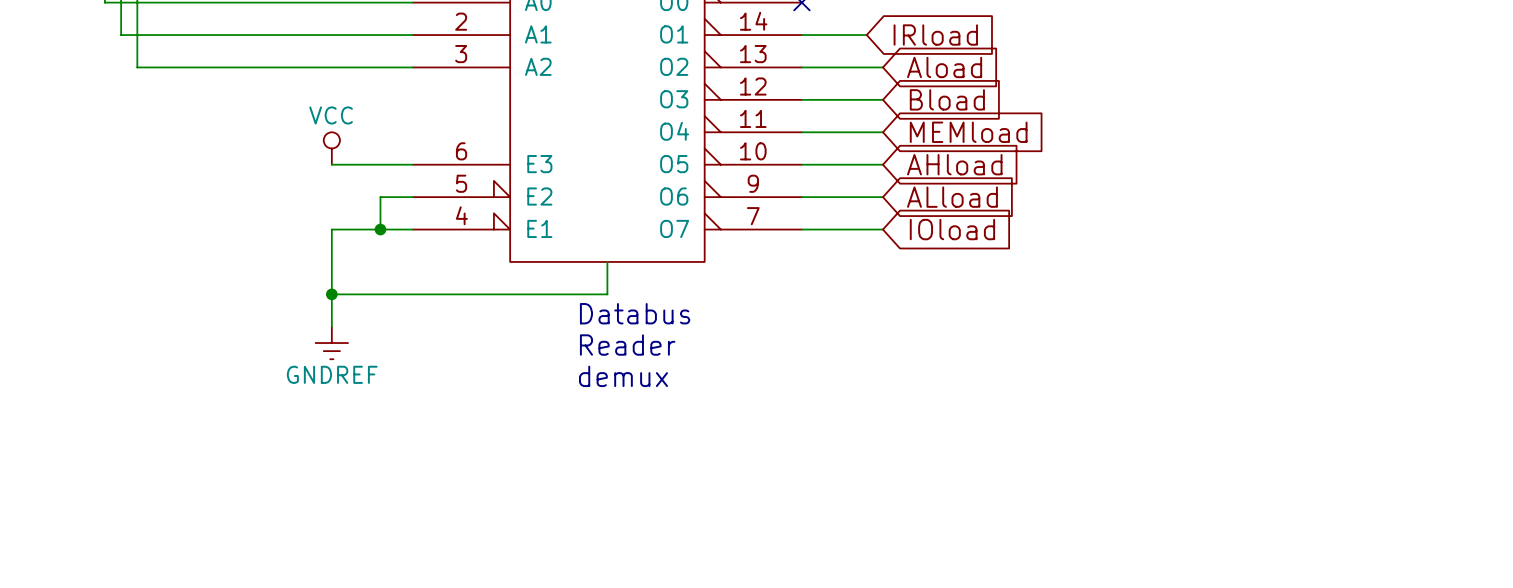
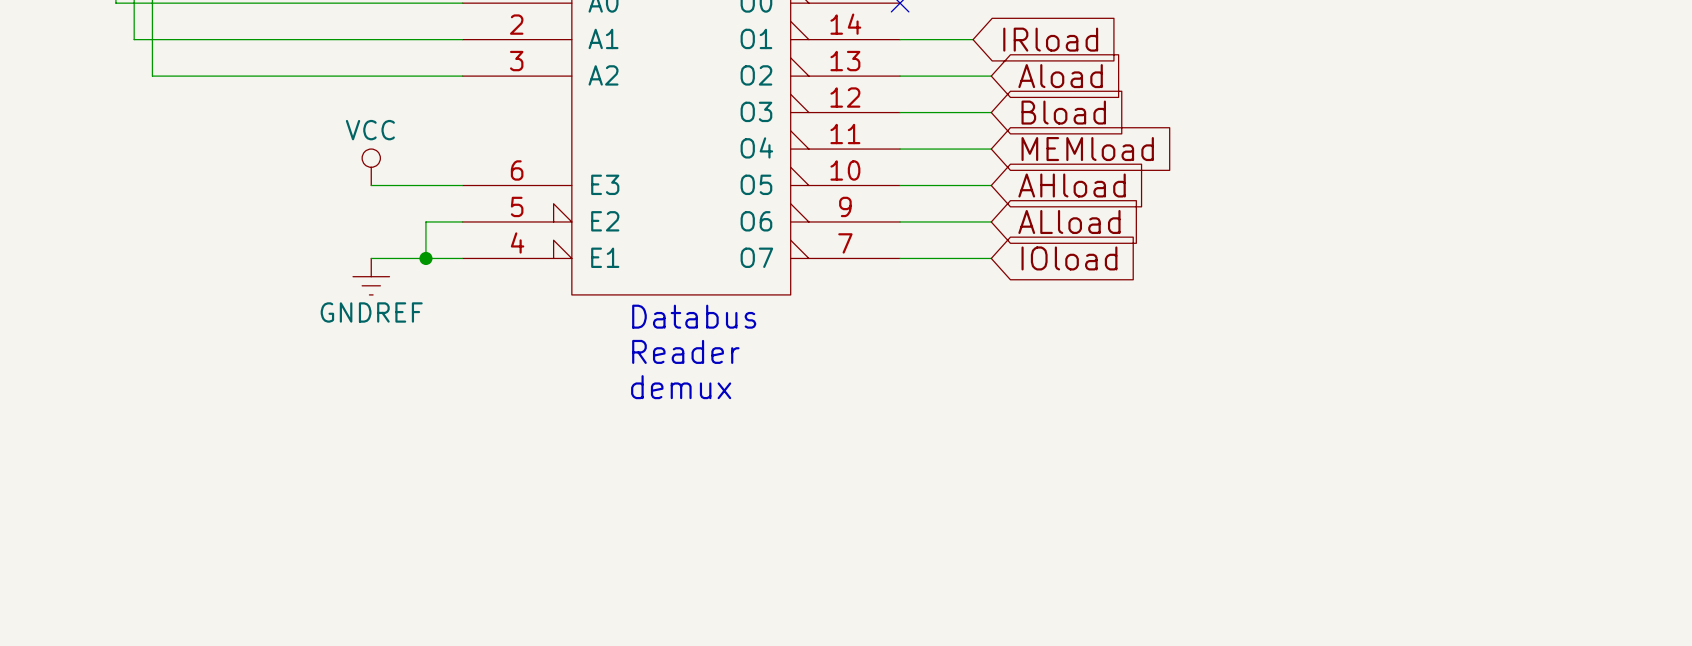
wire: (331, 229) (331, 326) -> none
wire: (607, 261) (607, 294) (331, 294) -> none
junction: (331, 294) -> none
text position: Databus (635, 313) -> Databus (694, 316)
power symbol position: GNDREF (331, 343) -> GNDREF (371, 276)
text position: Reader (627, 345) -> Reader (685, 351)
text position: demux (623, 376) -> demux (681, 387)

